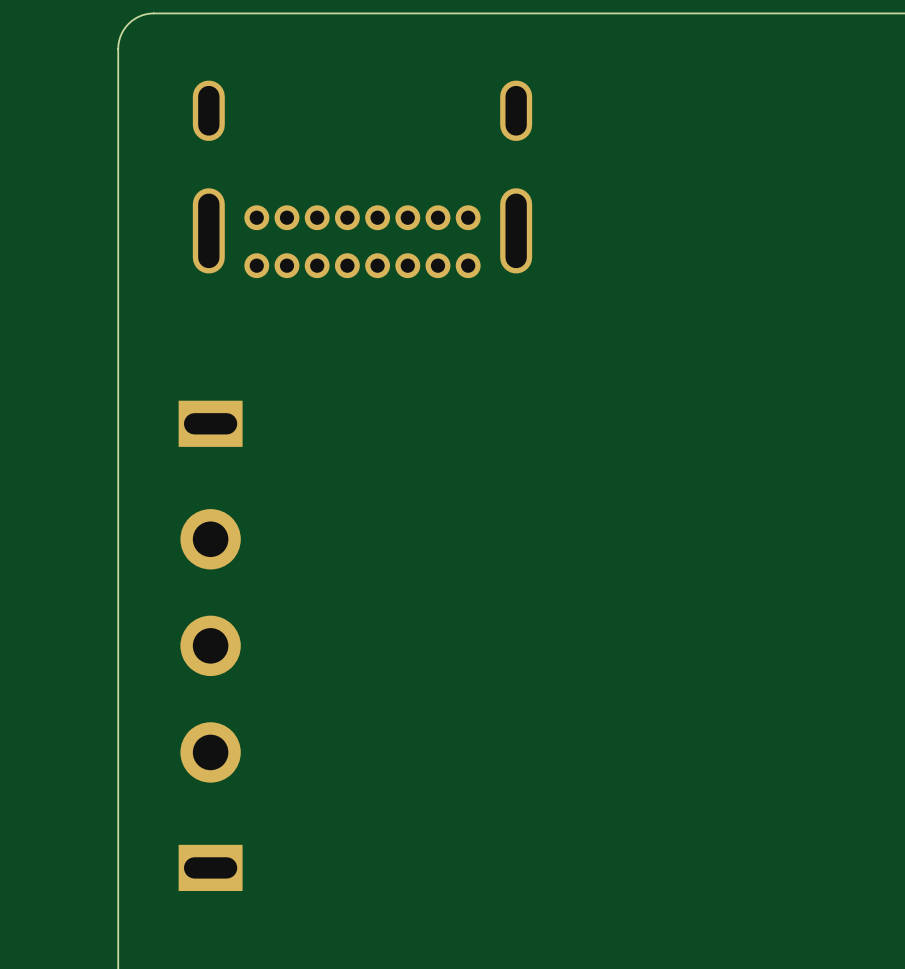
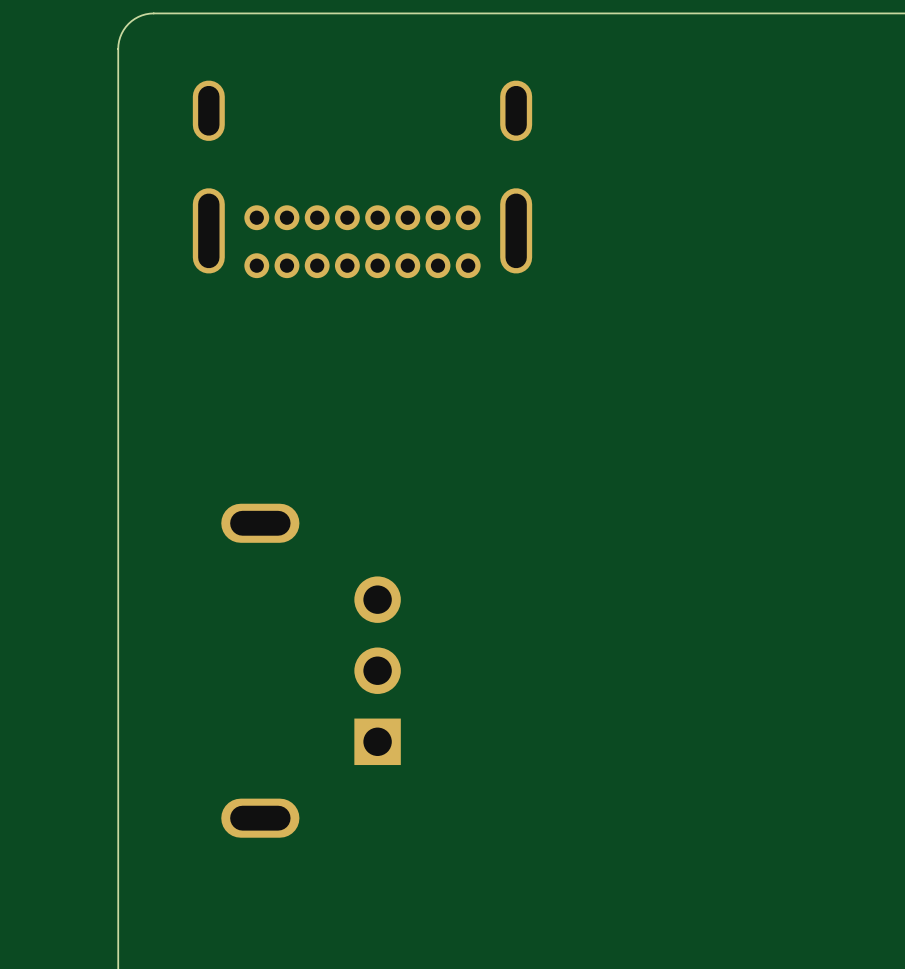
part: (210, 645) -> none
part: none -> (311, 670)

